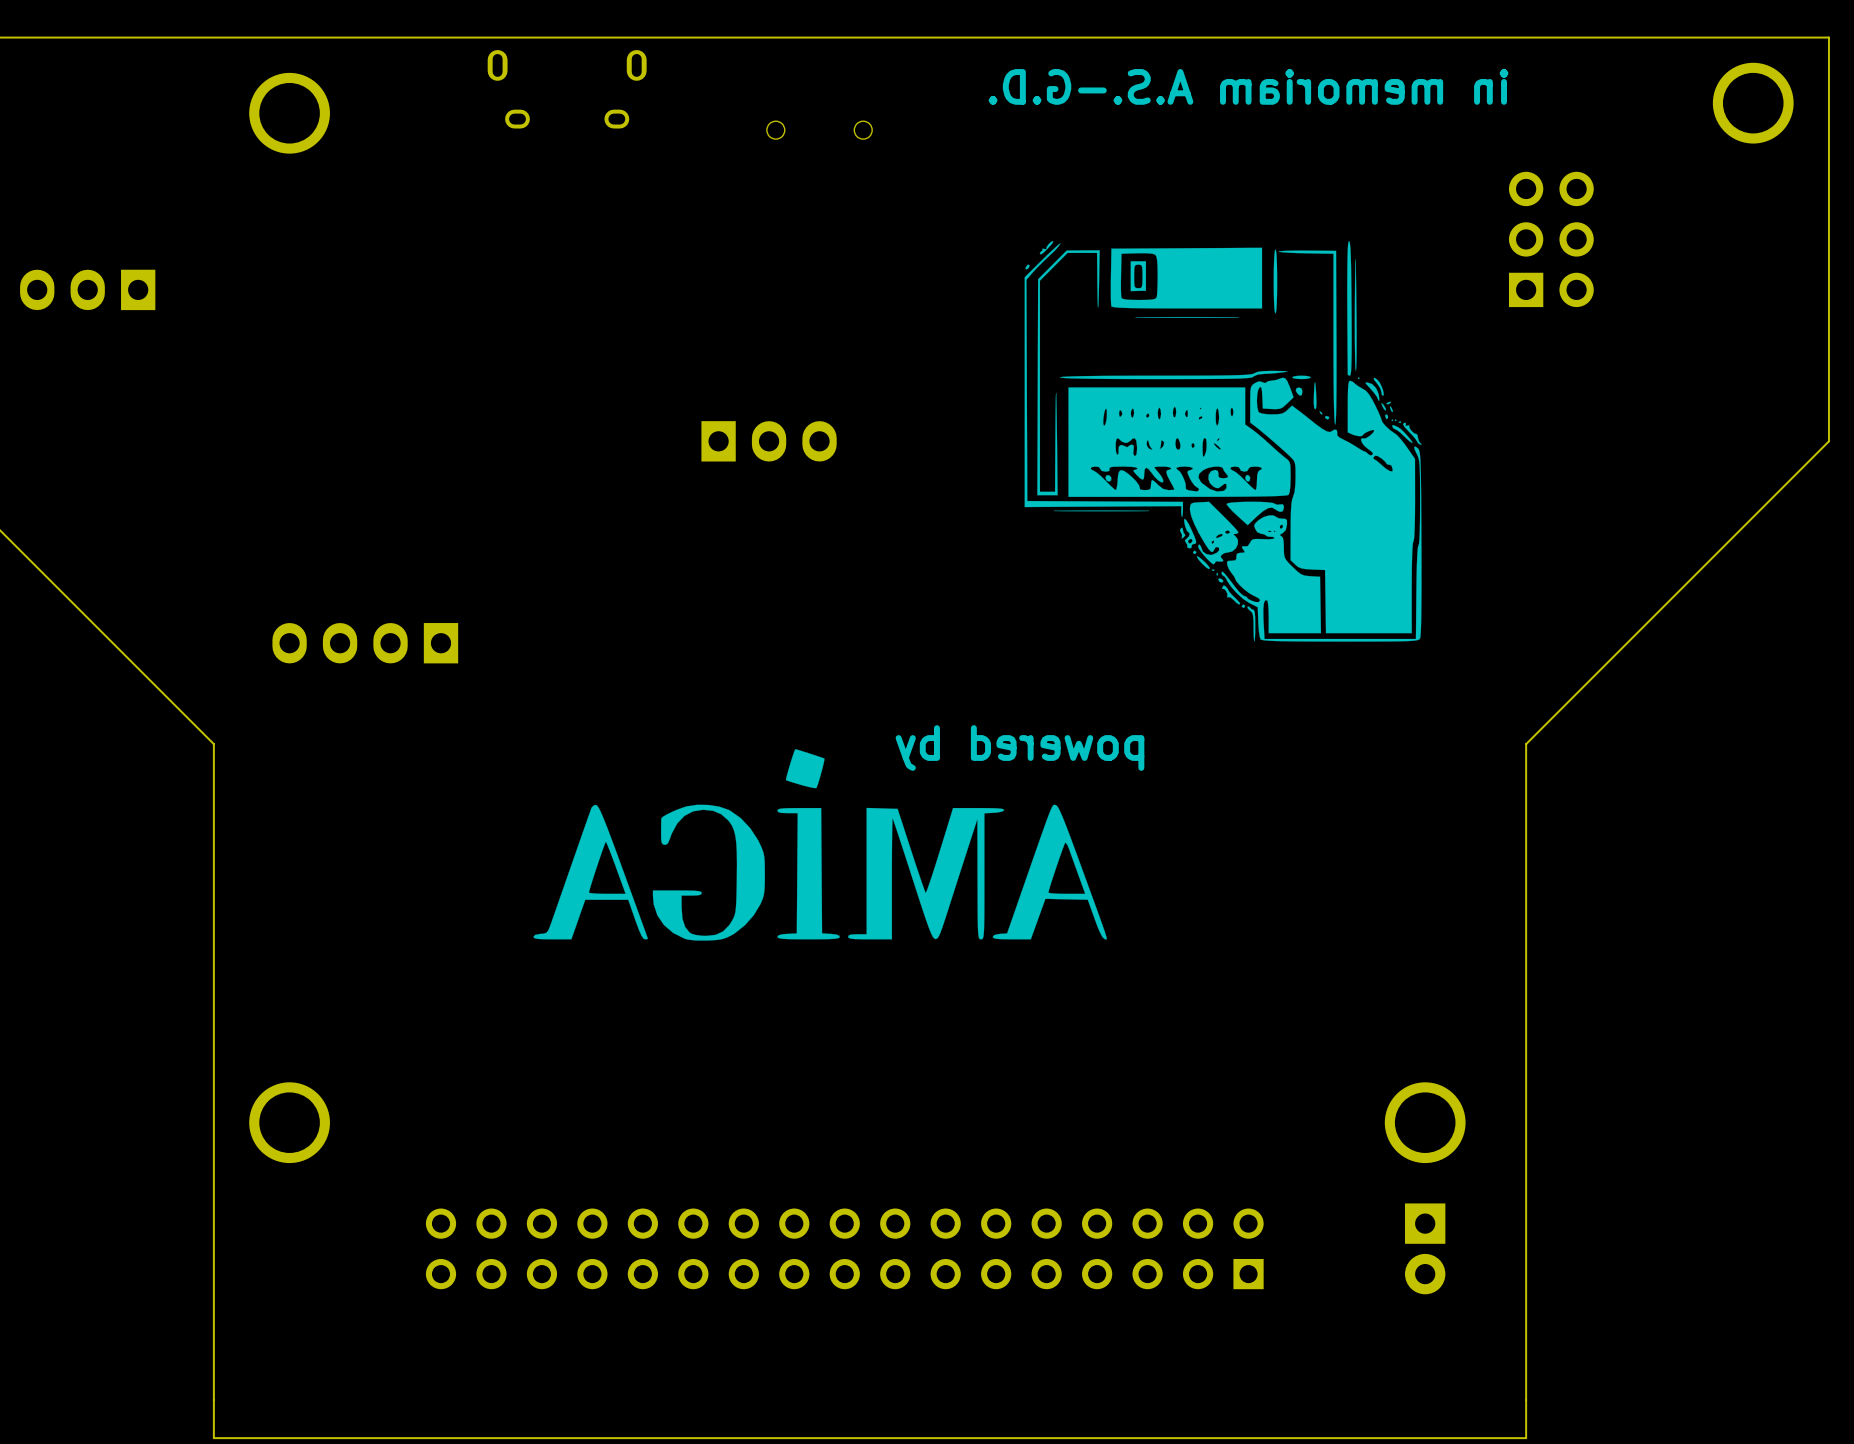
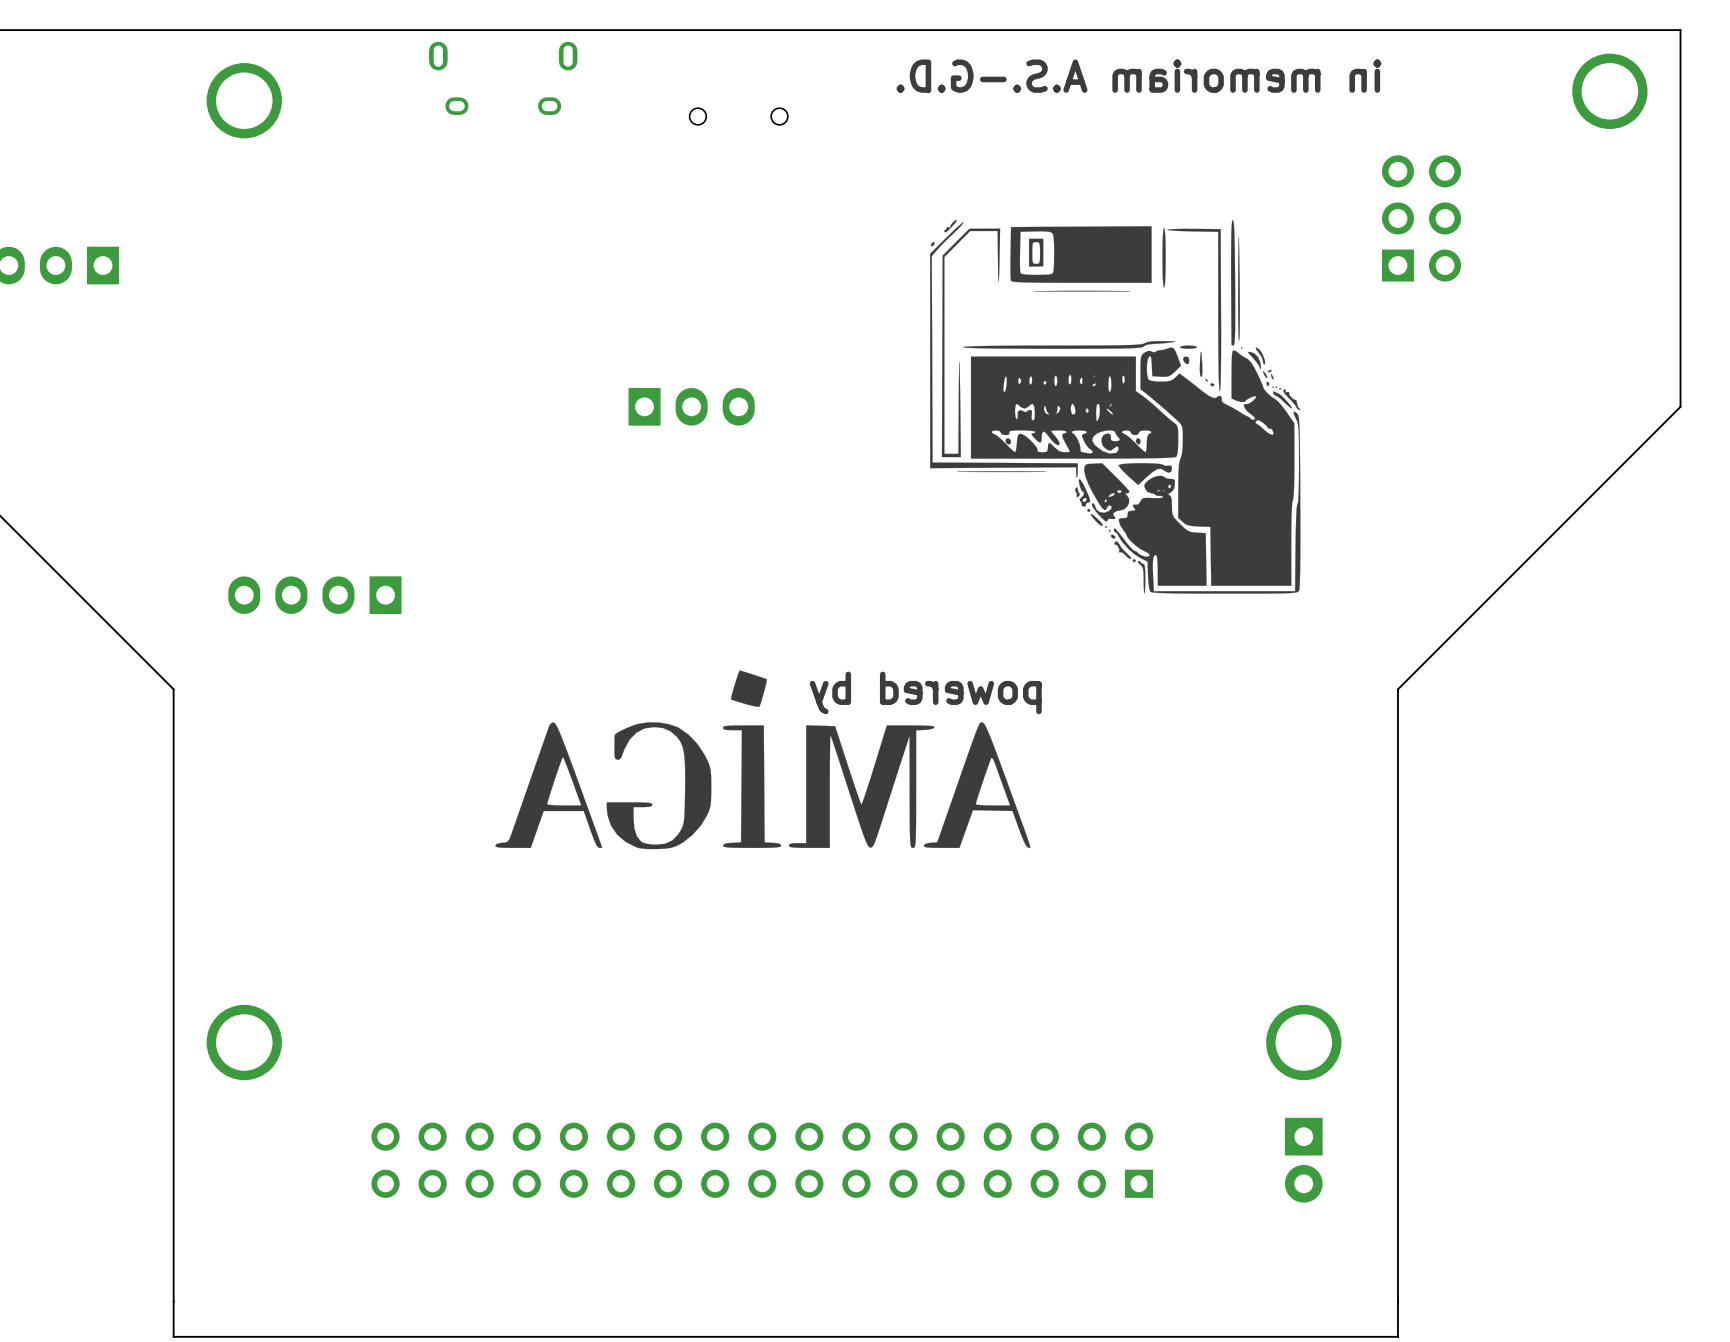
drawing position: (820, 844) -> (762, 759)

